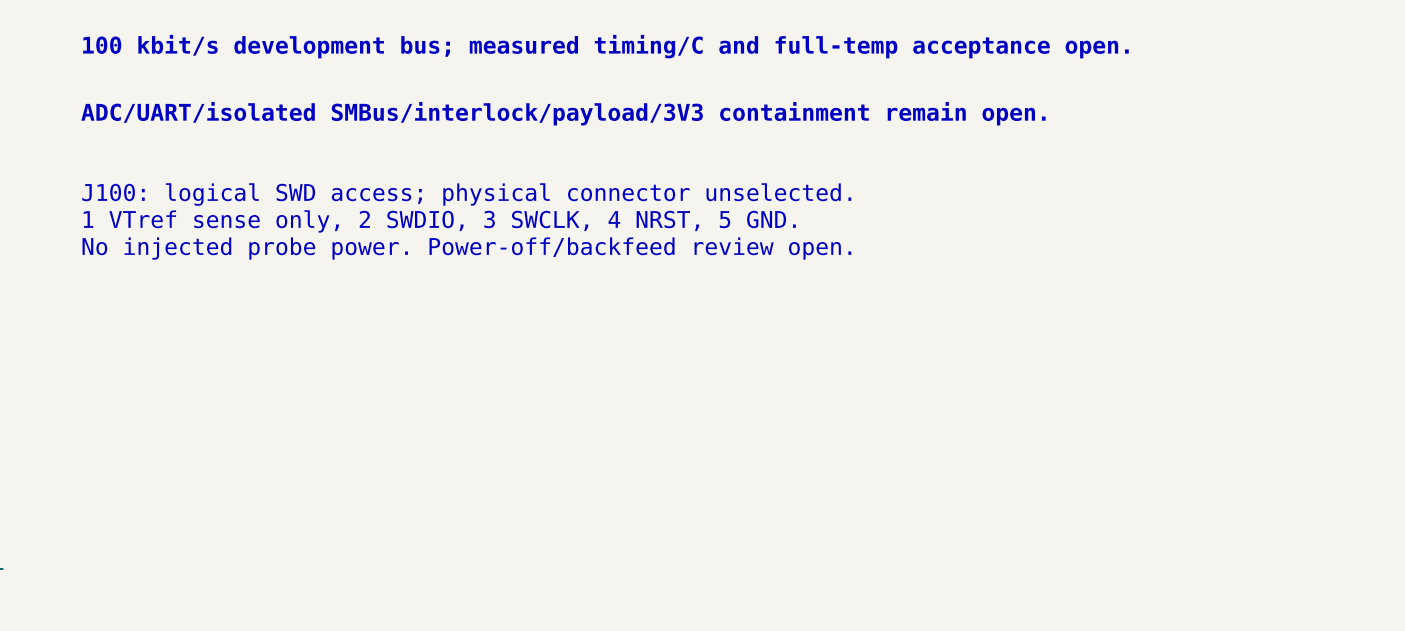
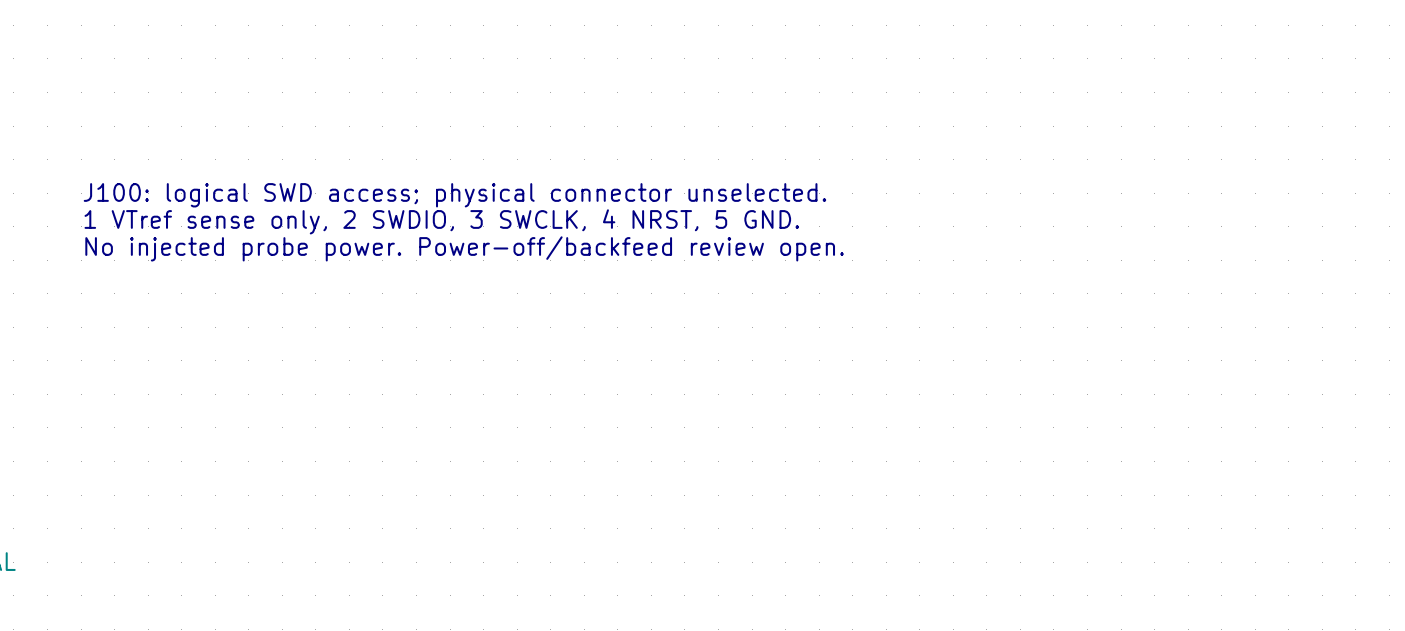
text: 100 kbit/s development bus; measured timing/C and full-temp acceptance open. (605, 46) -> none
text: ADC/UART/isolated SMBus/interlock/payload/3V3 containment remain open. (563, 113) -> none

